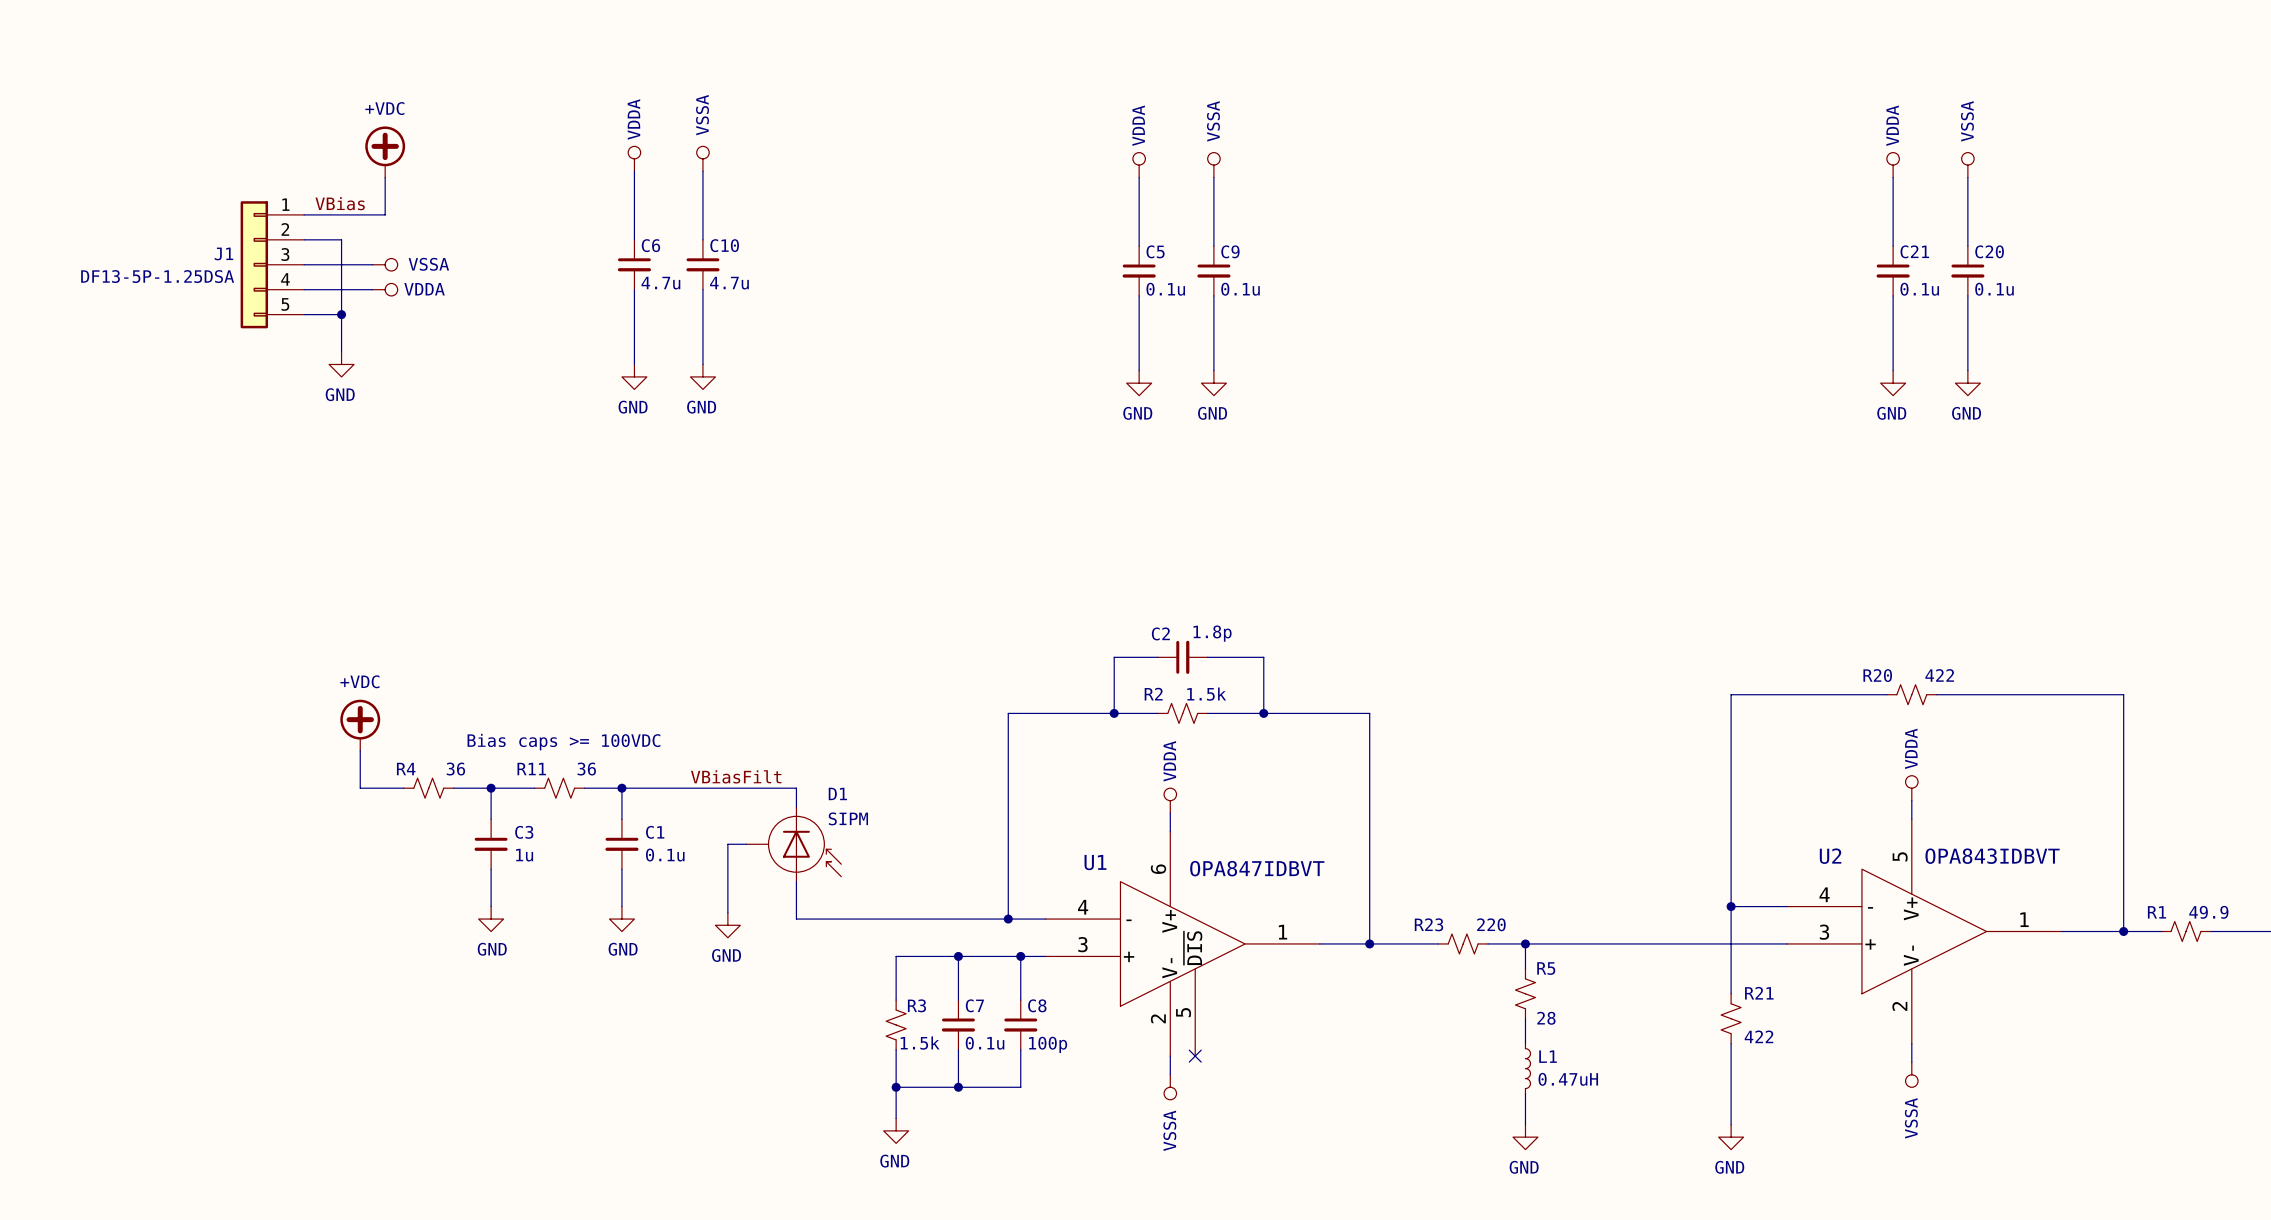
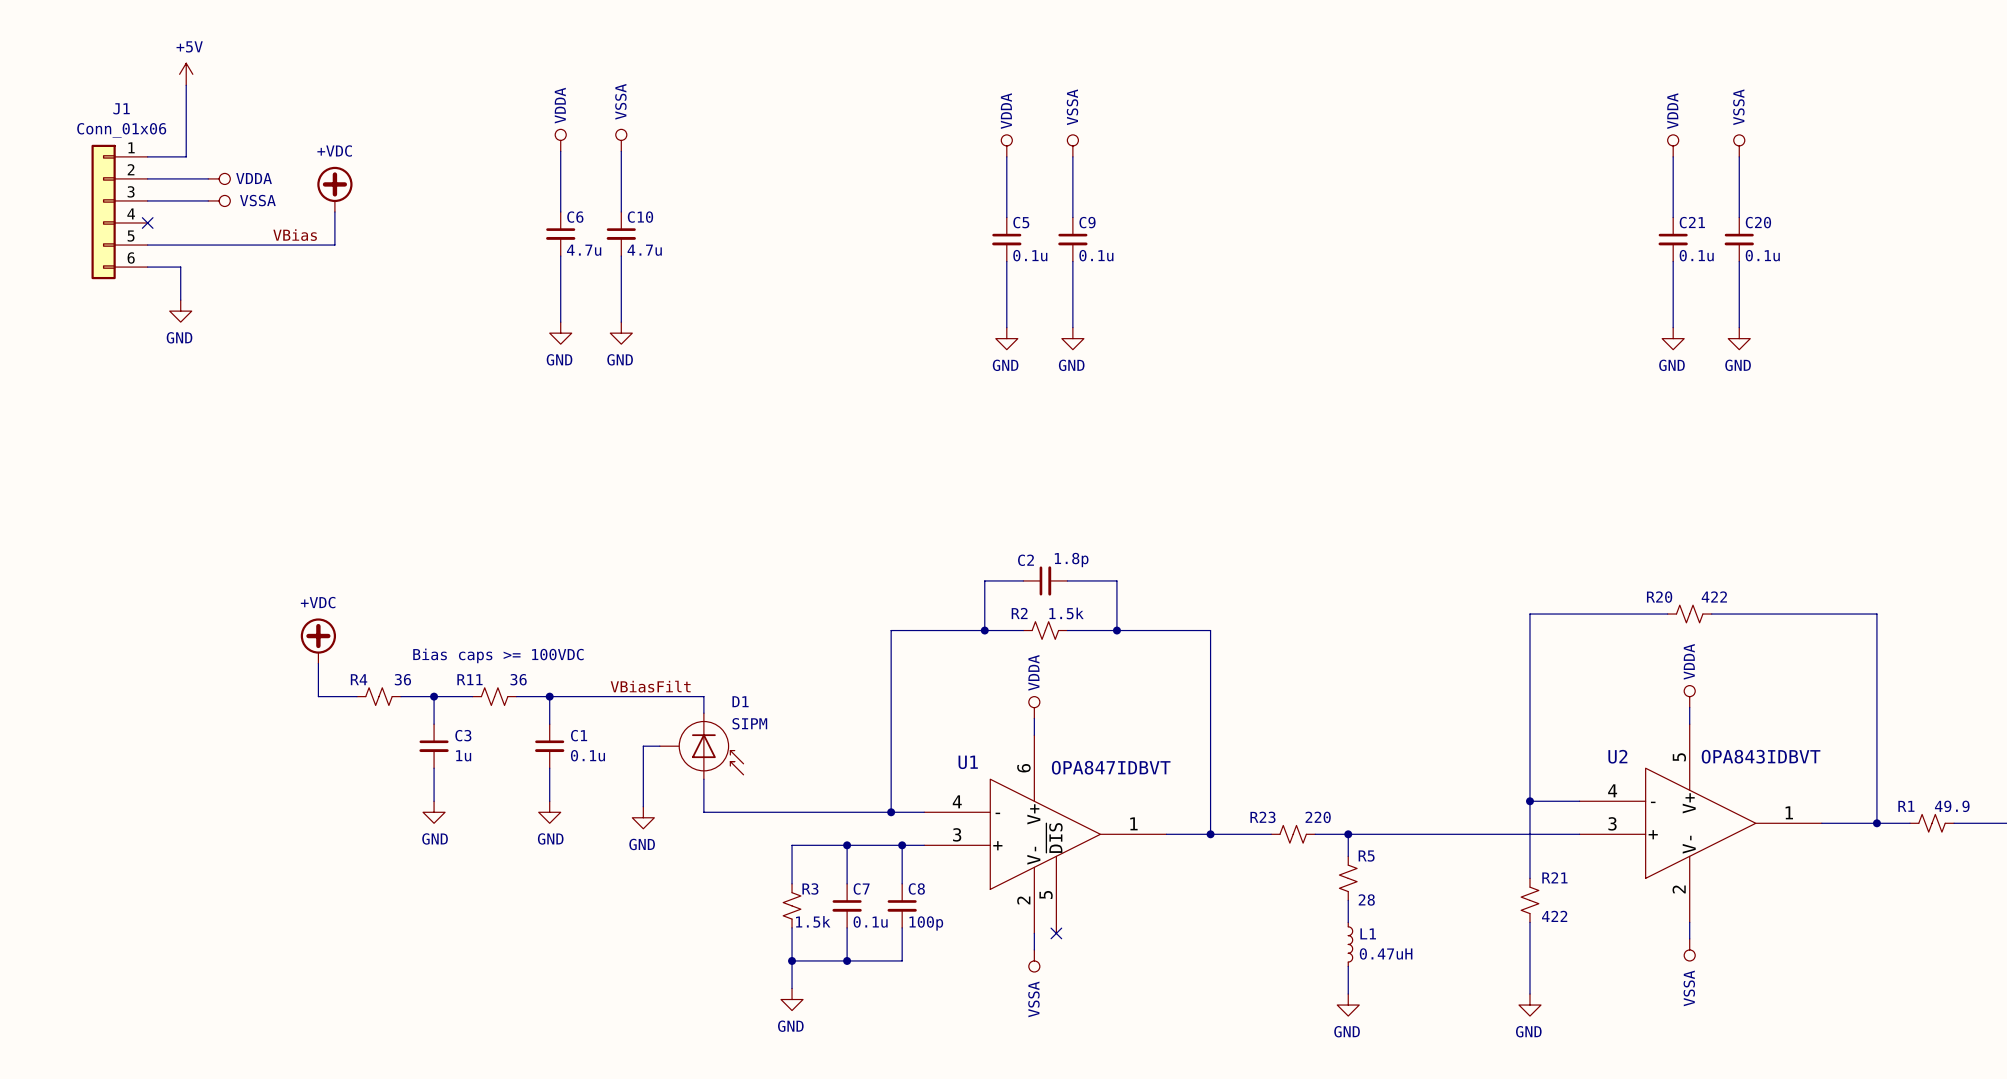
power symbol: none -> +5V (186, 74)
wire: none -> (186, 85) (186, 156) (147, 156)
power symbol position: +VDC (385, 151) -> +VDC (334, 189)
wire: (385, 177) (385, 214) (304, 214) -> none
J1 symbol: [240, 201, 305, 329] -> [91, 144, 148, 280]
label position: VBias (340, 203) -> VBias (295, 235)
wire: (304, 239) (341, 239) (341, 352) -> none
wire: none -> (334, 211) (334, 245) (147, 245)
no-connect mark: none -> (147, 223)
J1 name position: J1 (223, 253) -> J1 (121, 108)
wire: (304, 264) (372, 264) -> (147, 178) (208, 178)
power symbol position: VSSA (385, 264) -> VSSA (219, 200)
J1 value: DF13-5P-1.25DSA (157, 276) -> Conn_01x06 (121, 130)
wire: (304, 289) (372, 289) -> (147, 200) (208, 200)
power symbol position: VDDA (385, 289) -> VDDA (219, 178)
wire: none -> (147, 267) (180, 267) (180, 300)
wire: (304, 314) (341, 314) -> none
junction: (341, 314) -> none
power symbol position: GND (341, 364) -> GND (180, 311)

